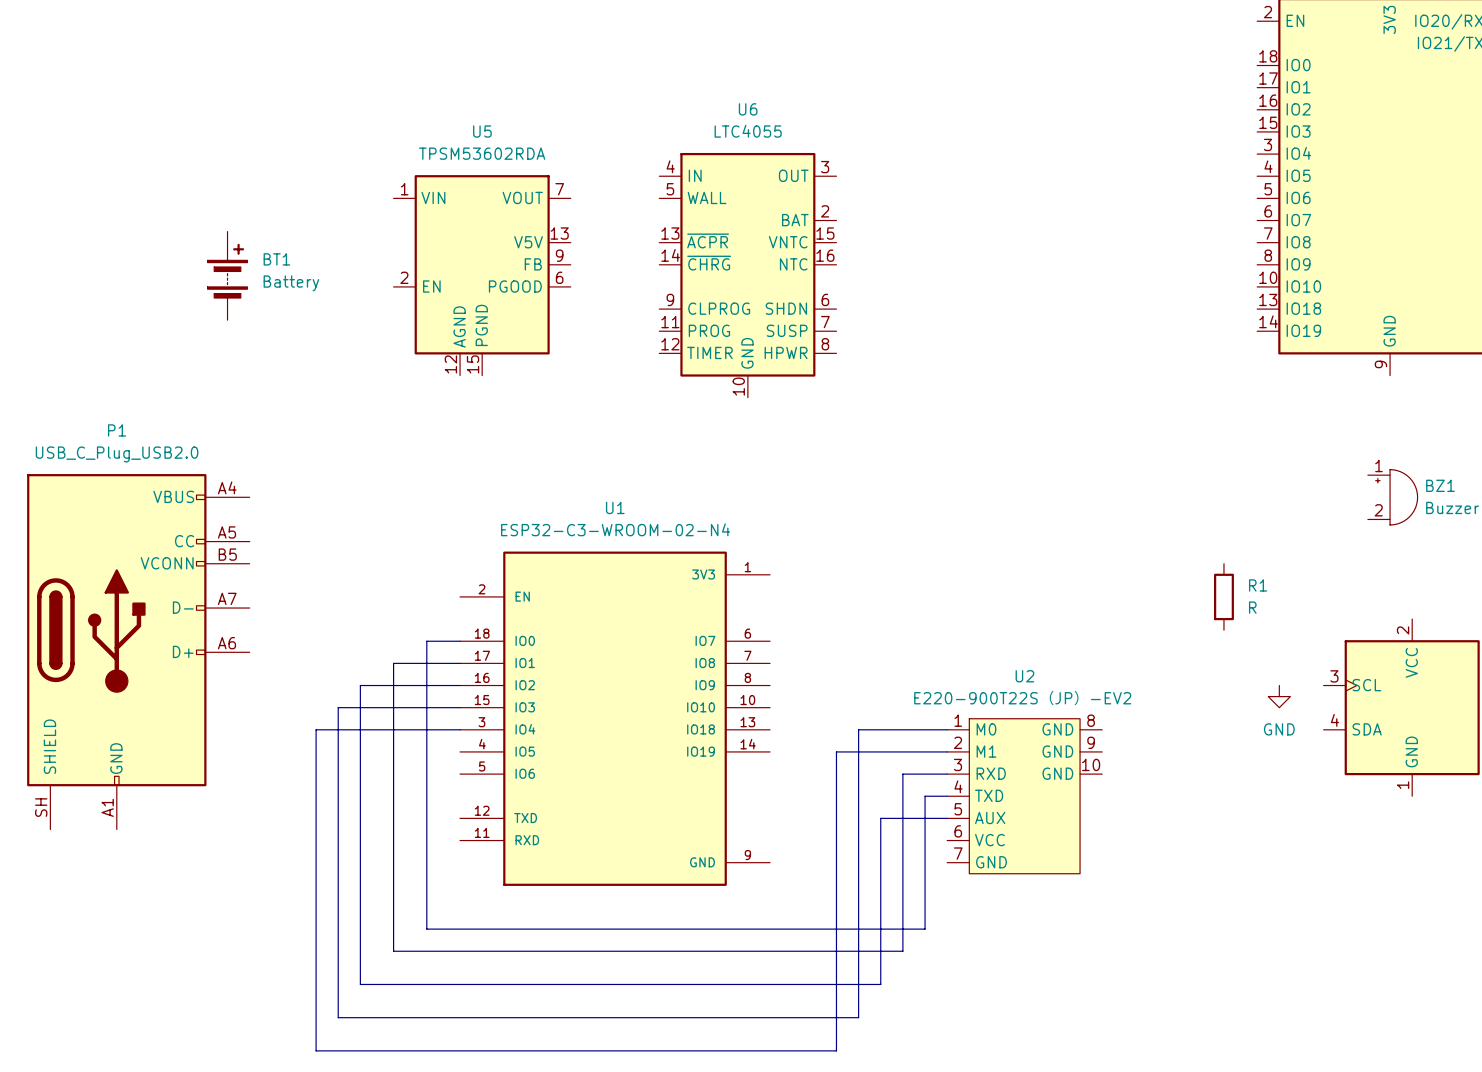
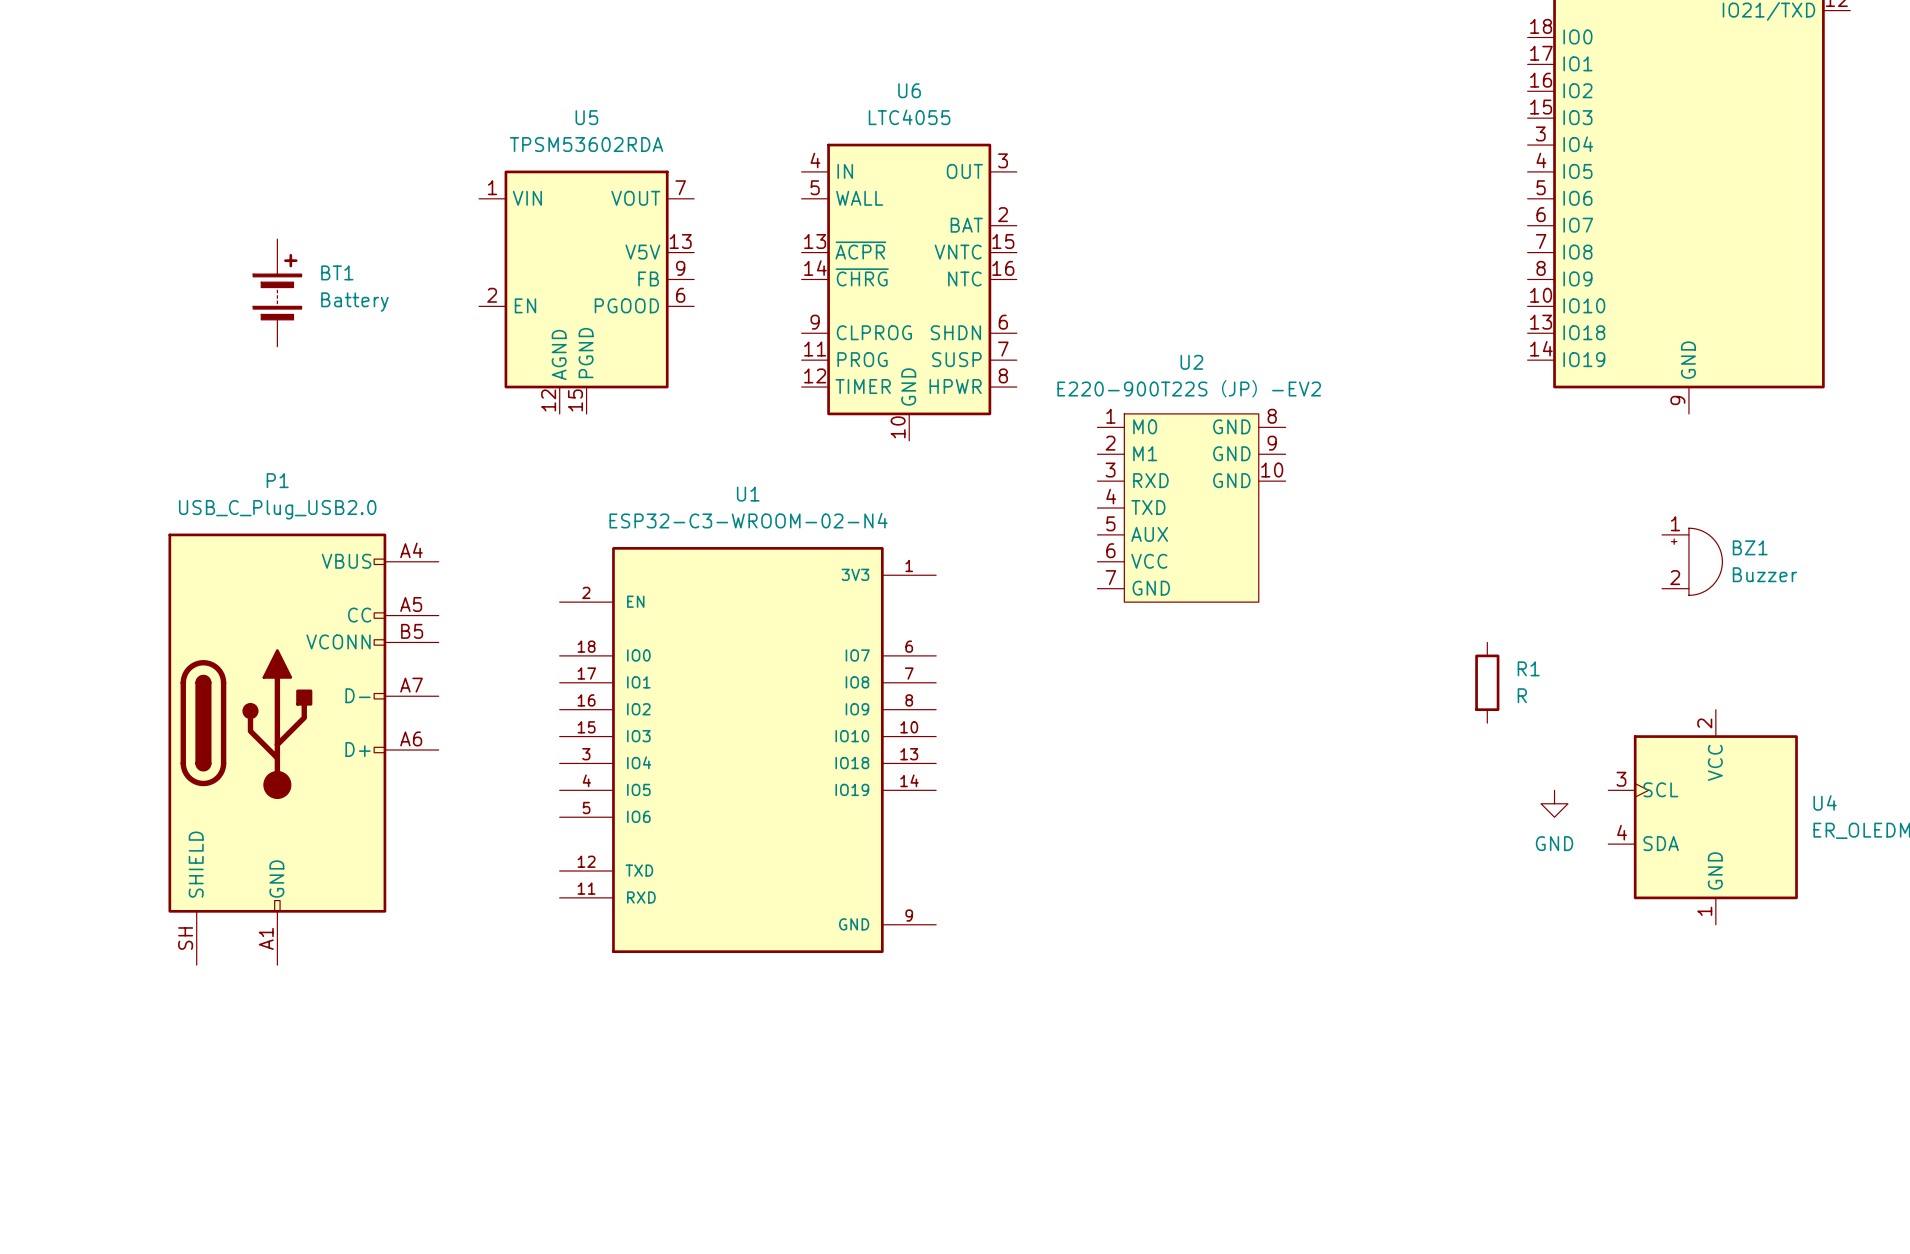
bus: (460, 641) (426, 641) (426, 929) (925, 929) (925, 796) (947, 796) -> none
P1 position: (138, 651) -> (303, 749)
bus: (460, 663) (393, 663) (393, 951) (902, 951) (902, 774) (947, 774) -> none
bus: (460, 685) (360, 685) (360, 984) (880, 984) (880, 818) (947, 818) -> none
bus: (460, 707) (338, 707) (338, 1017) (858, 1017) (858, 729) (947, 729) -> none
U1 position: (615, 718) -> (747, 750)
bus: (460, 729) (316, 729) (316, 1050) (836, 1050) (836, 751) (947, 751) -> none
U2 position: (1024, 796) -> (1191, 508)

